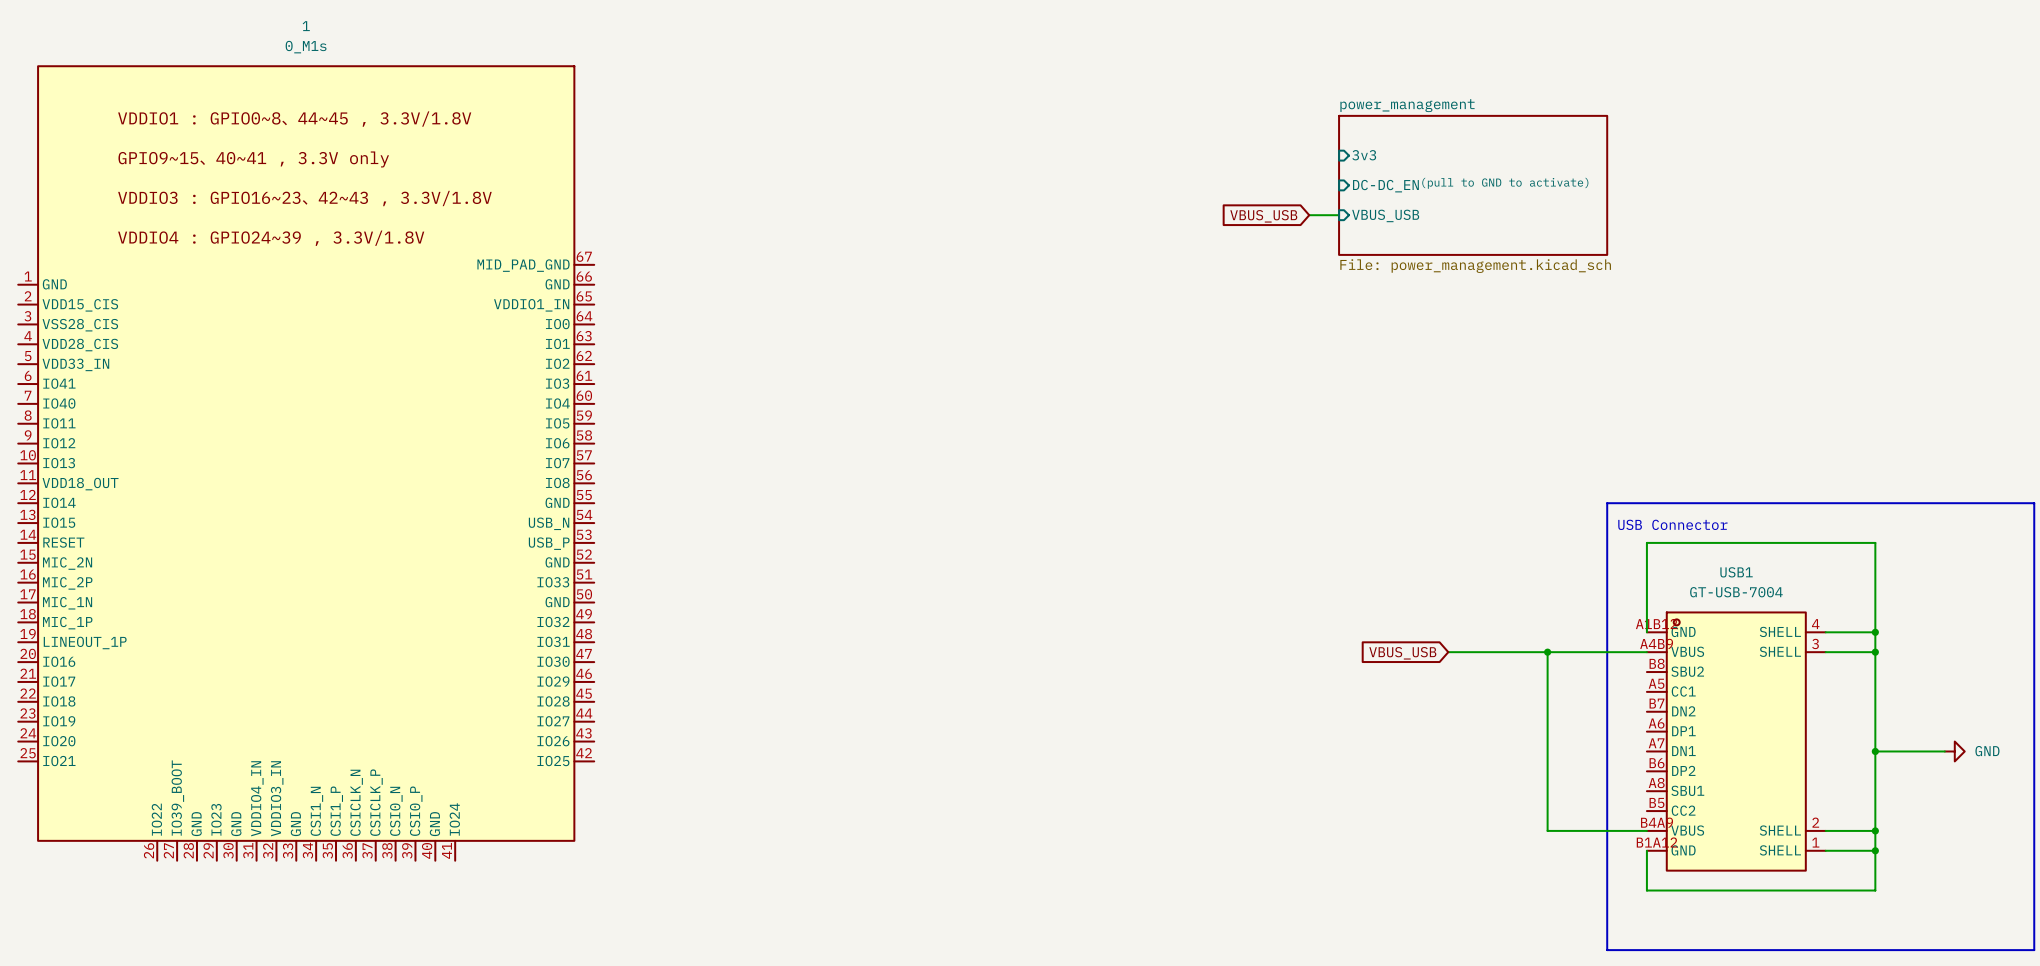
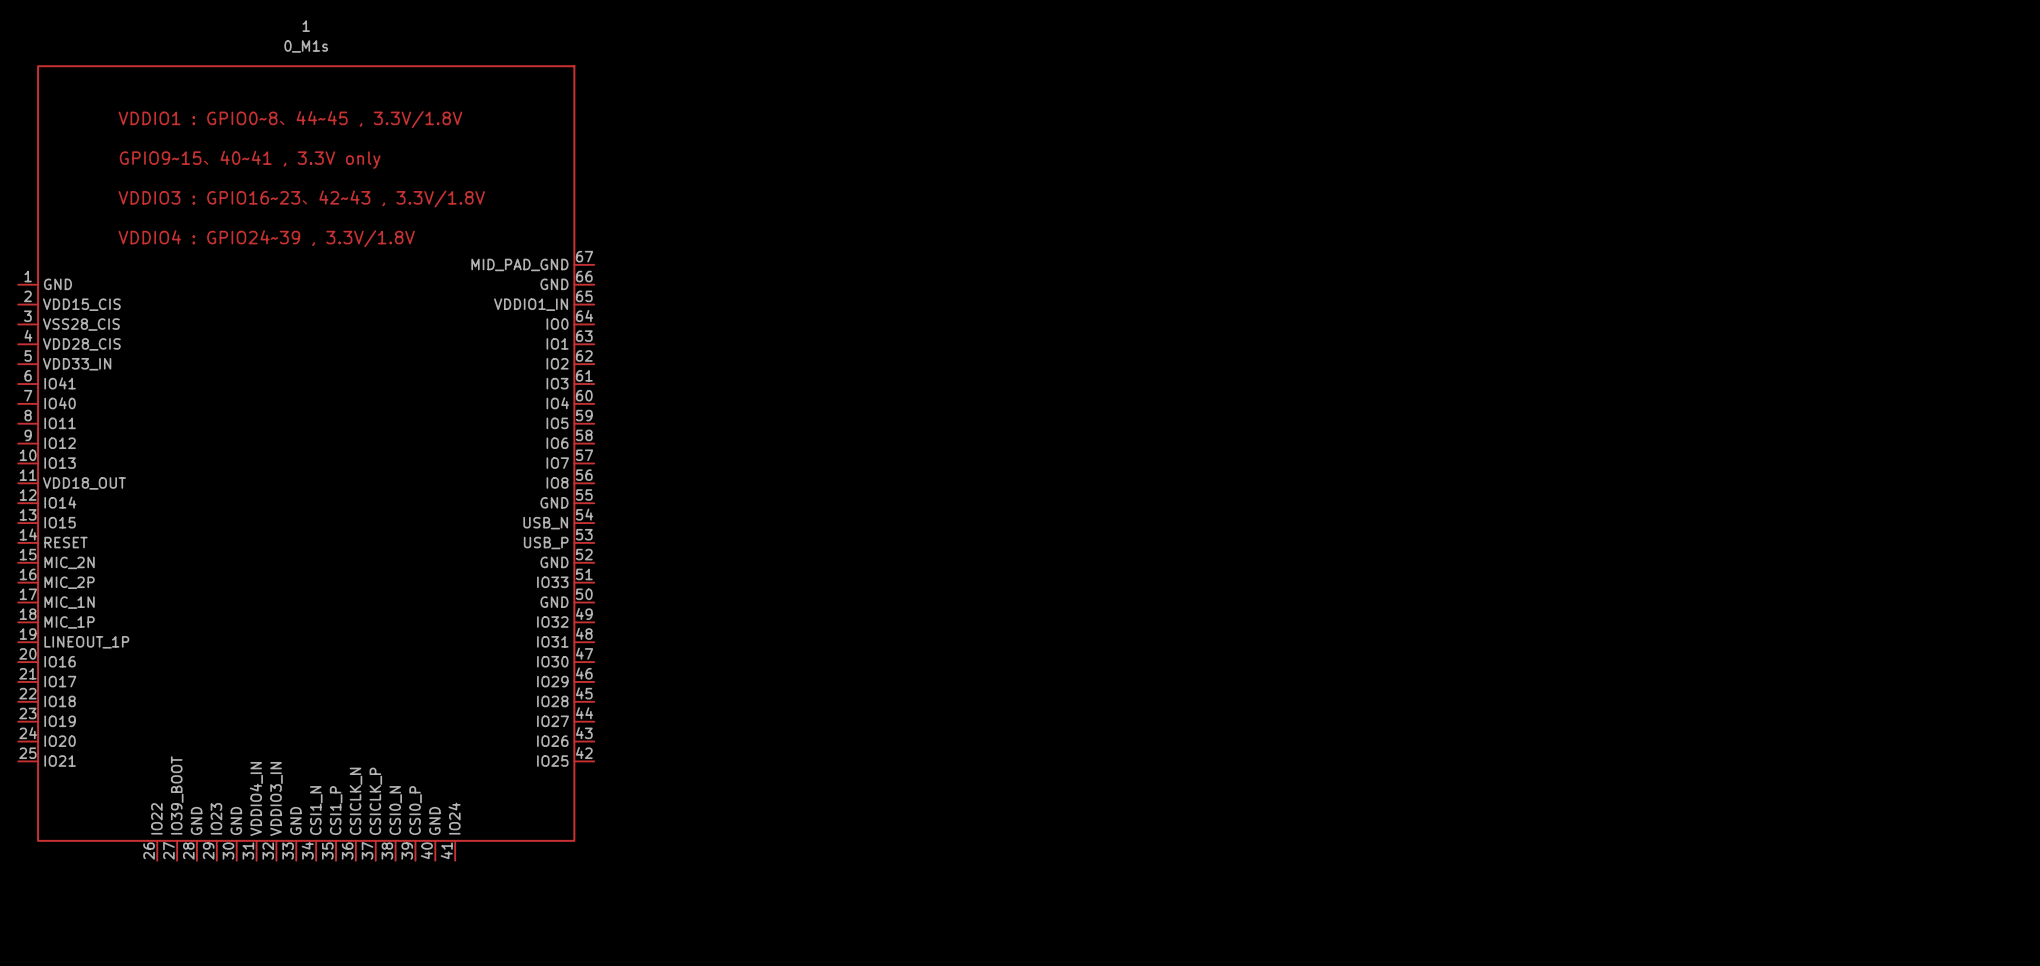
sheet pin: 3v3 (1364, 155) -> none
sheet pin: DC-DC_EN(pull to GND to activate) (1470, 185) -> none
sheet power_management: File: power_management.kicad_sch (1473, 185) -> none
wire: (1309, 215) (1339, 215) -> none
sheet pin: VBUS_USB (1385, 215) -> none
global label: VBUS_USB (1263, 216) -> none
line: (1607, 503) (2034, 503) (2034, 950) (1607, 950) (1607, 503) -> none
text: USB Connector (1672, 524) -> none
wire: (1646, 632) (1646, 542) (1875, 542) (1875, 890) (1646, 890) (1646, 850) -> none
wire: (1825, 632) (1875, 632) -> none
junction: (1875, 632) -> none
wire: (1448, 652) (1646, 652) -> none
wire: (1547, 652) (1547, 830) (1646, 830) -> none
junction: (1547, 652) -> none
wire: (1825, 652) (1875, 652) -> none
junction: (1875, 652) -> none
global label: VBUS_USB (1402, 653) -> none
USB1: GT-USB-7004 (1736, 741) -> none
wire: (1875, 751) (1944, 751) -> none
junction: (1875, 751) -> none
power symbol: GND (1954, 751) -> none
wire: (1825, 830) (1875, 830) -> none
junction: (1875, 830) -> none
wire: (1825, 850) (1875, 850) -> none
junction: (1875, 850) -> none

